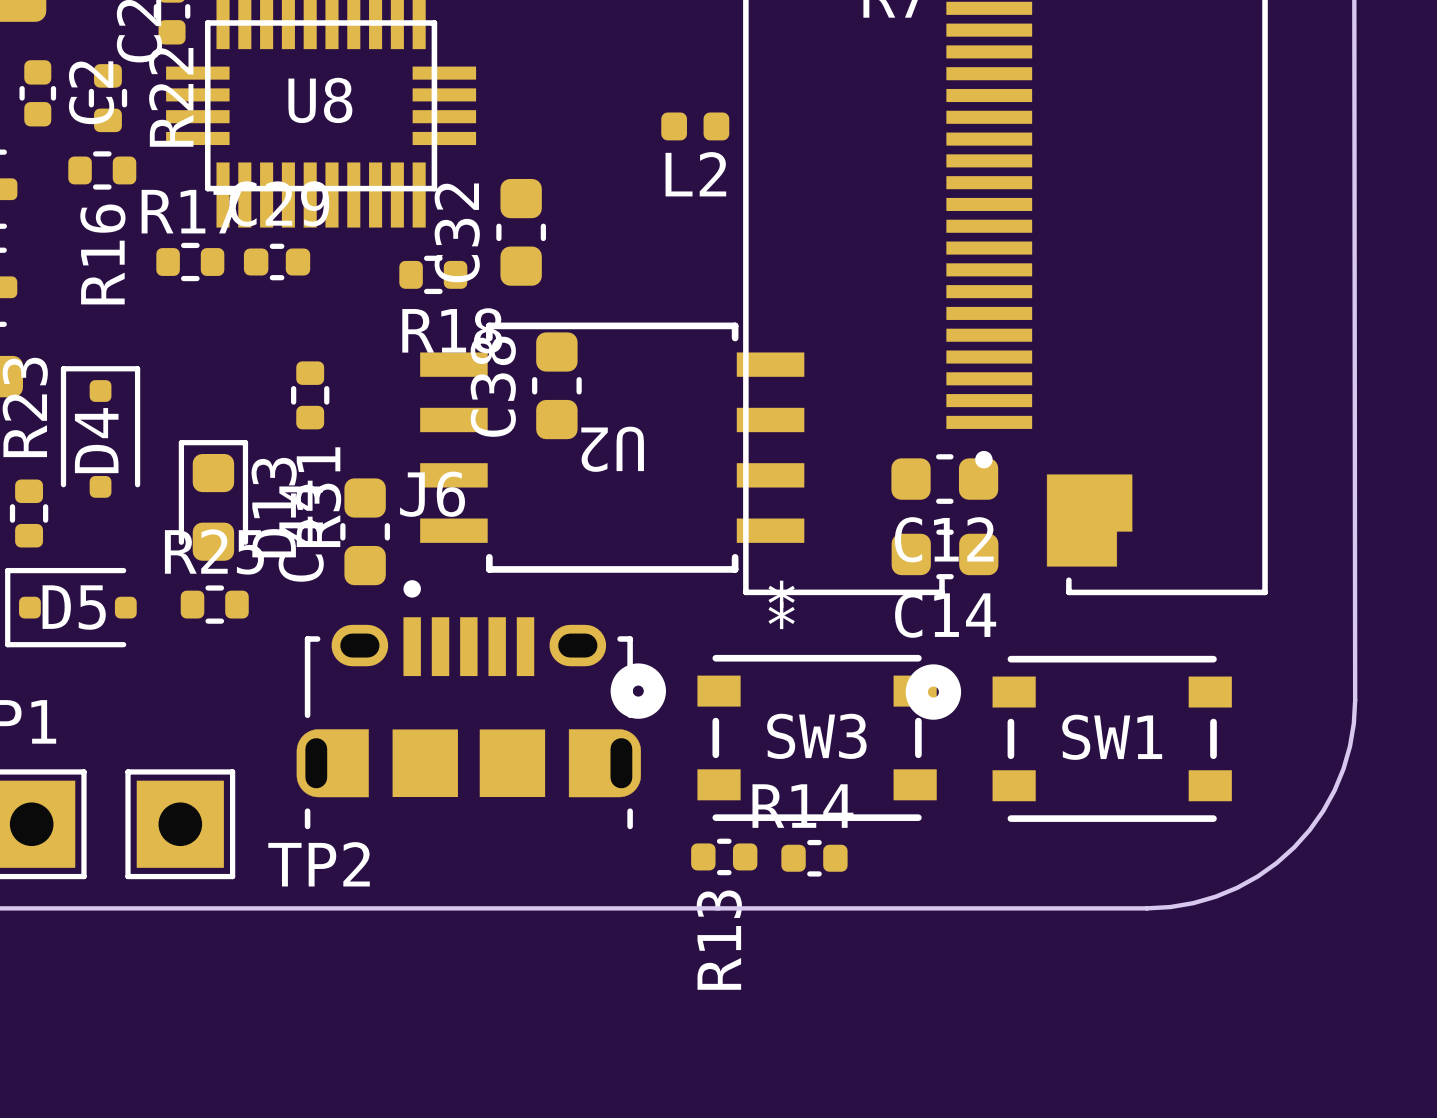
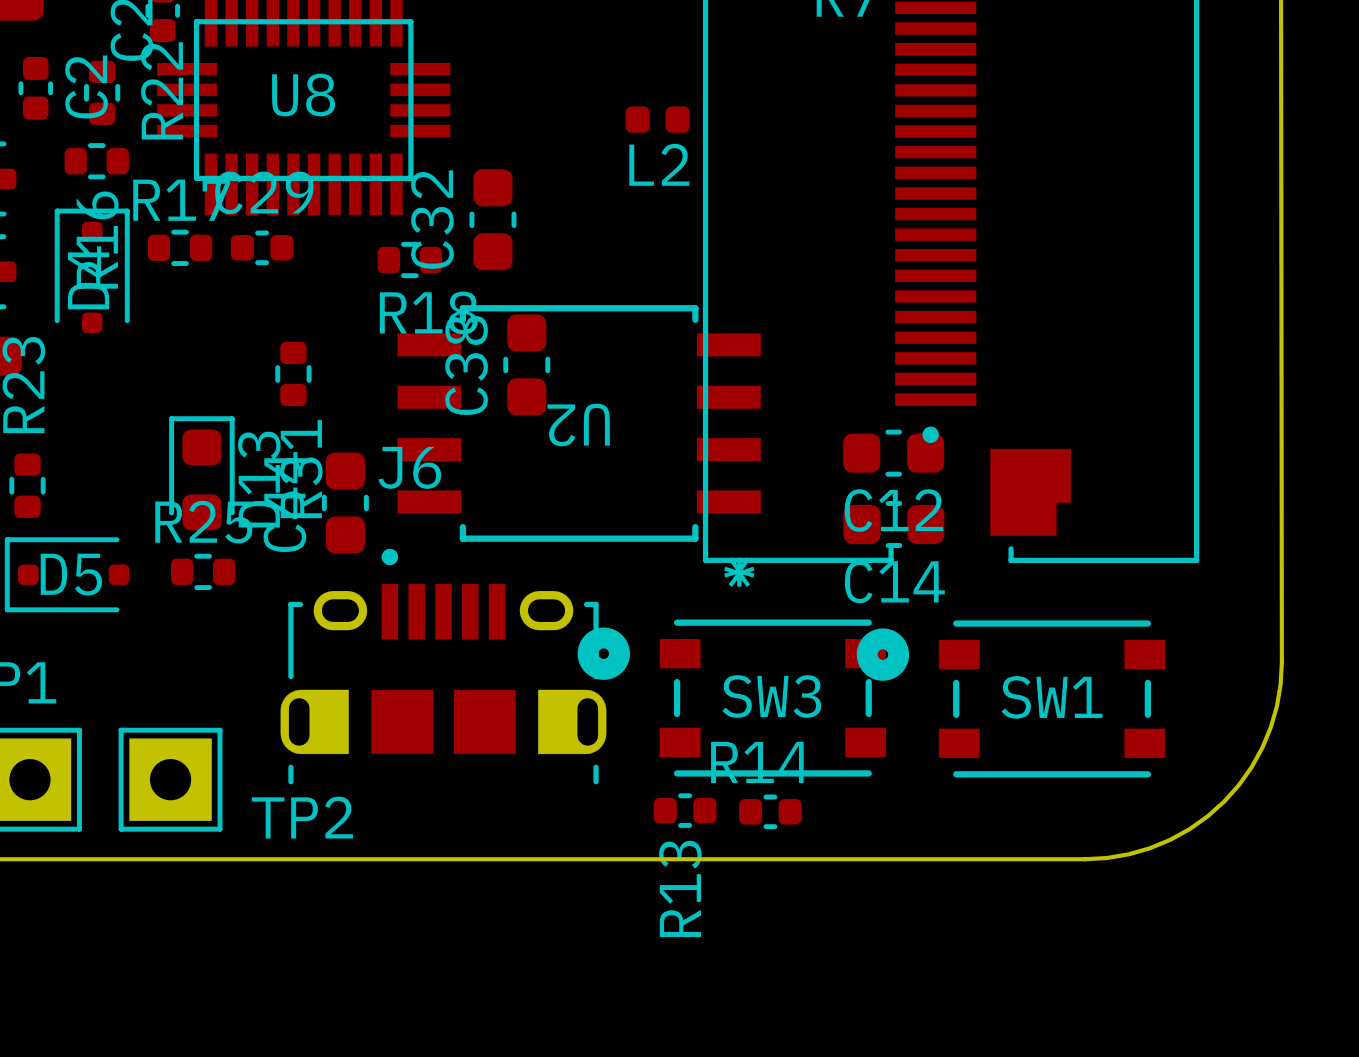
D4 position: (100, 431) -> (92, 270)

